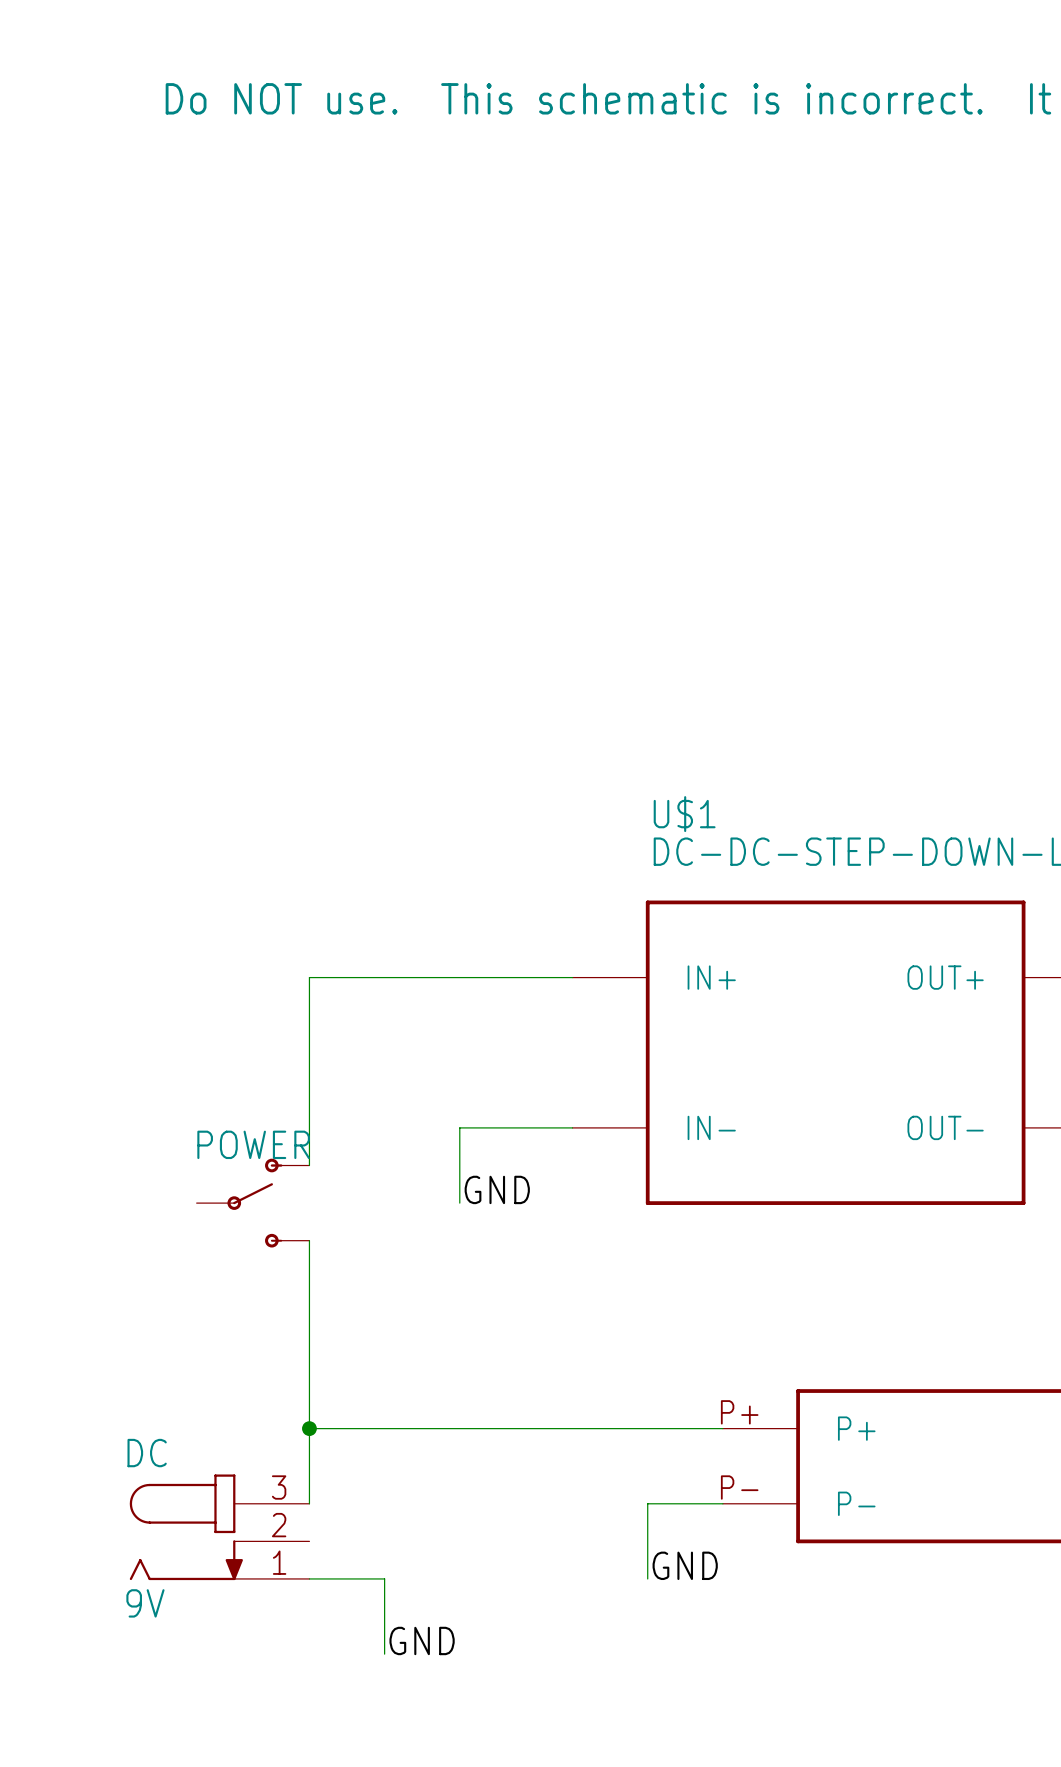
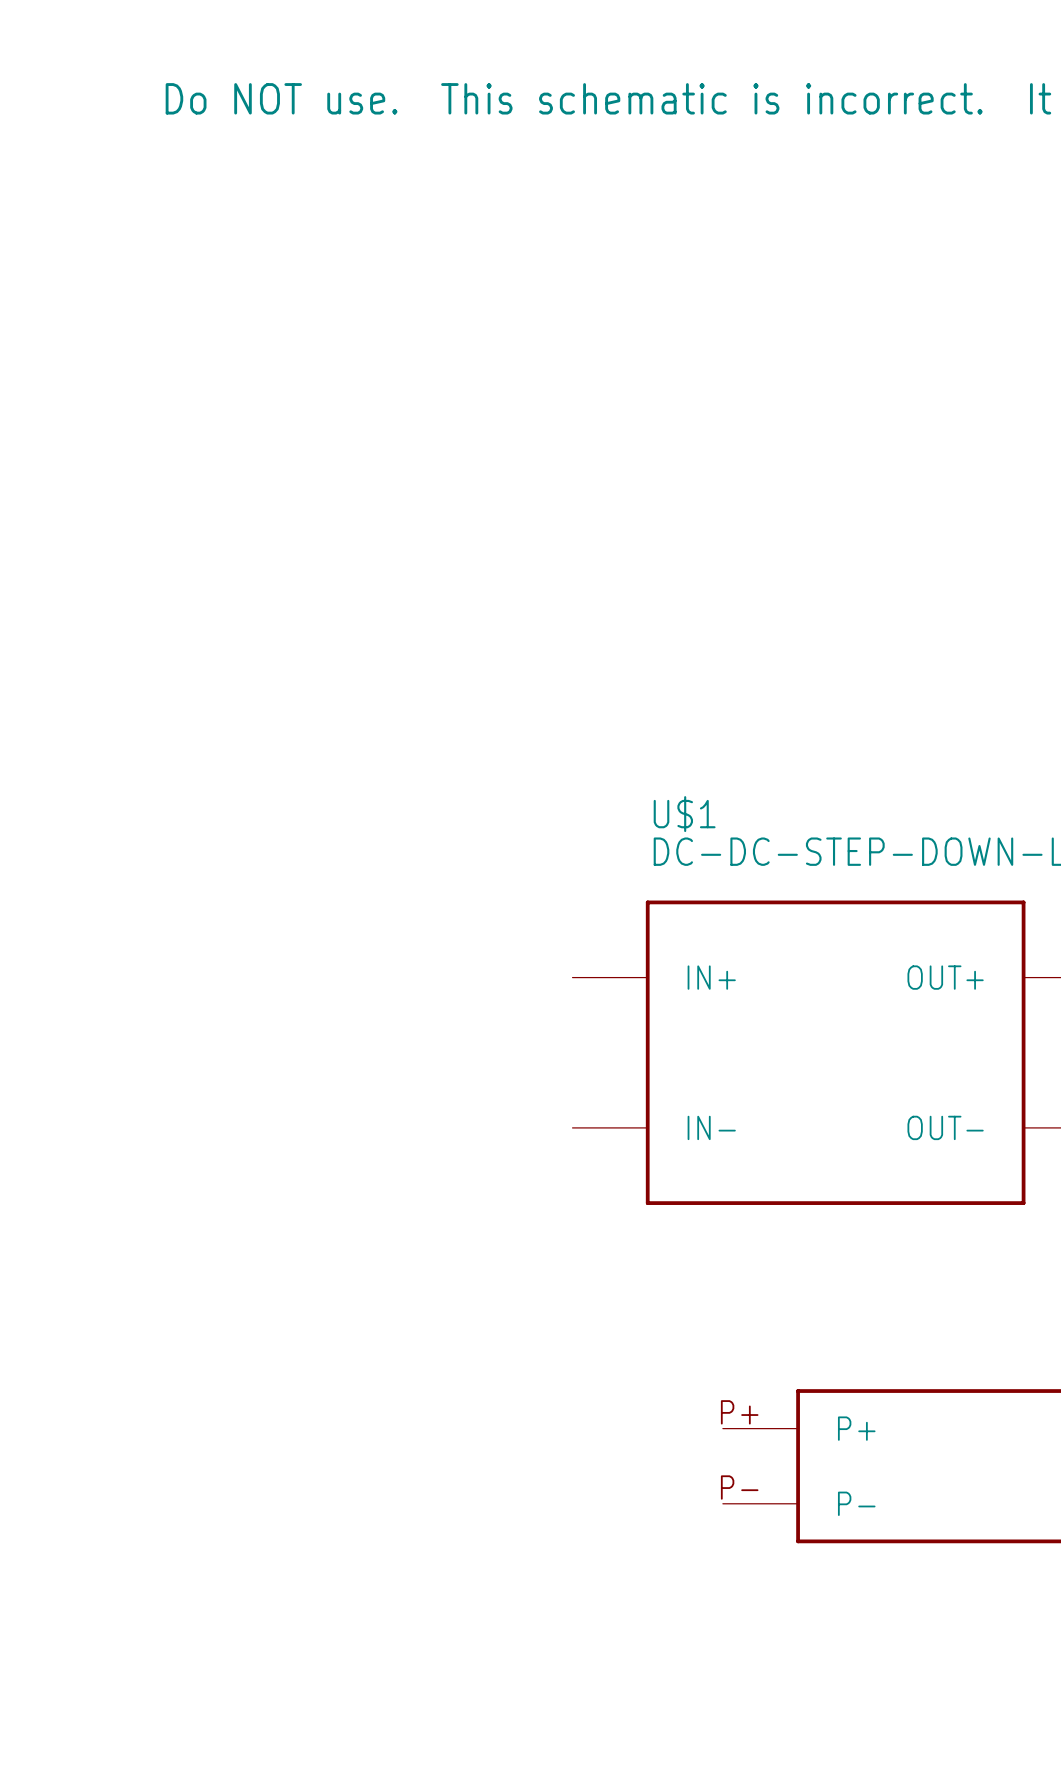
wire: (572, 977) (309, 977) (309, 1165) -> none
wire: (572, 1127) (459, 1127) (459, 1203) -> none
label: GND (497, 1189) -> none
POWER: (253, 1203) -> none
wire: (309, 1240) (309, 1503) -> none
wire: (309, 1428) (722, 1428) -> none
junction: (309, 1428) -> none
wire: (722, 1503) (647, 1503) (647, 1578) -> none
DC: 9V (219, 1527) -> none
label: GND (685, 1565) -> none
wire: (309, 1578) (384, 1578) (384, 1654) -> none
label: GND (422, 1640) -> none

